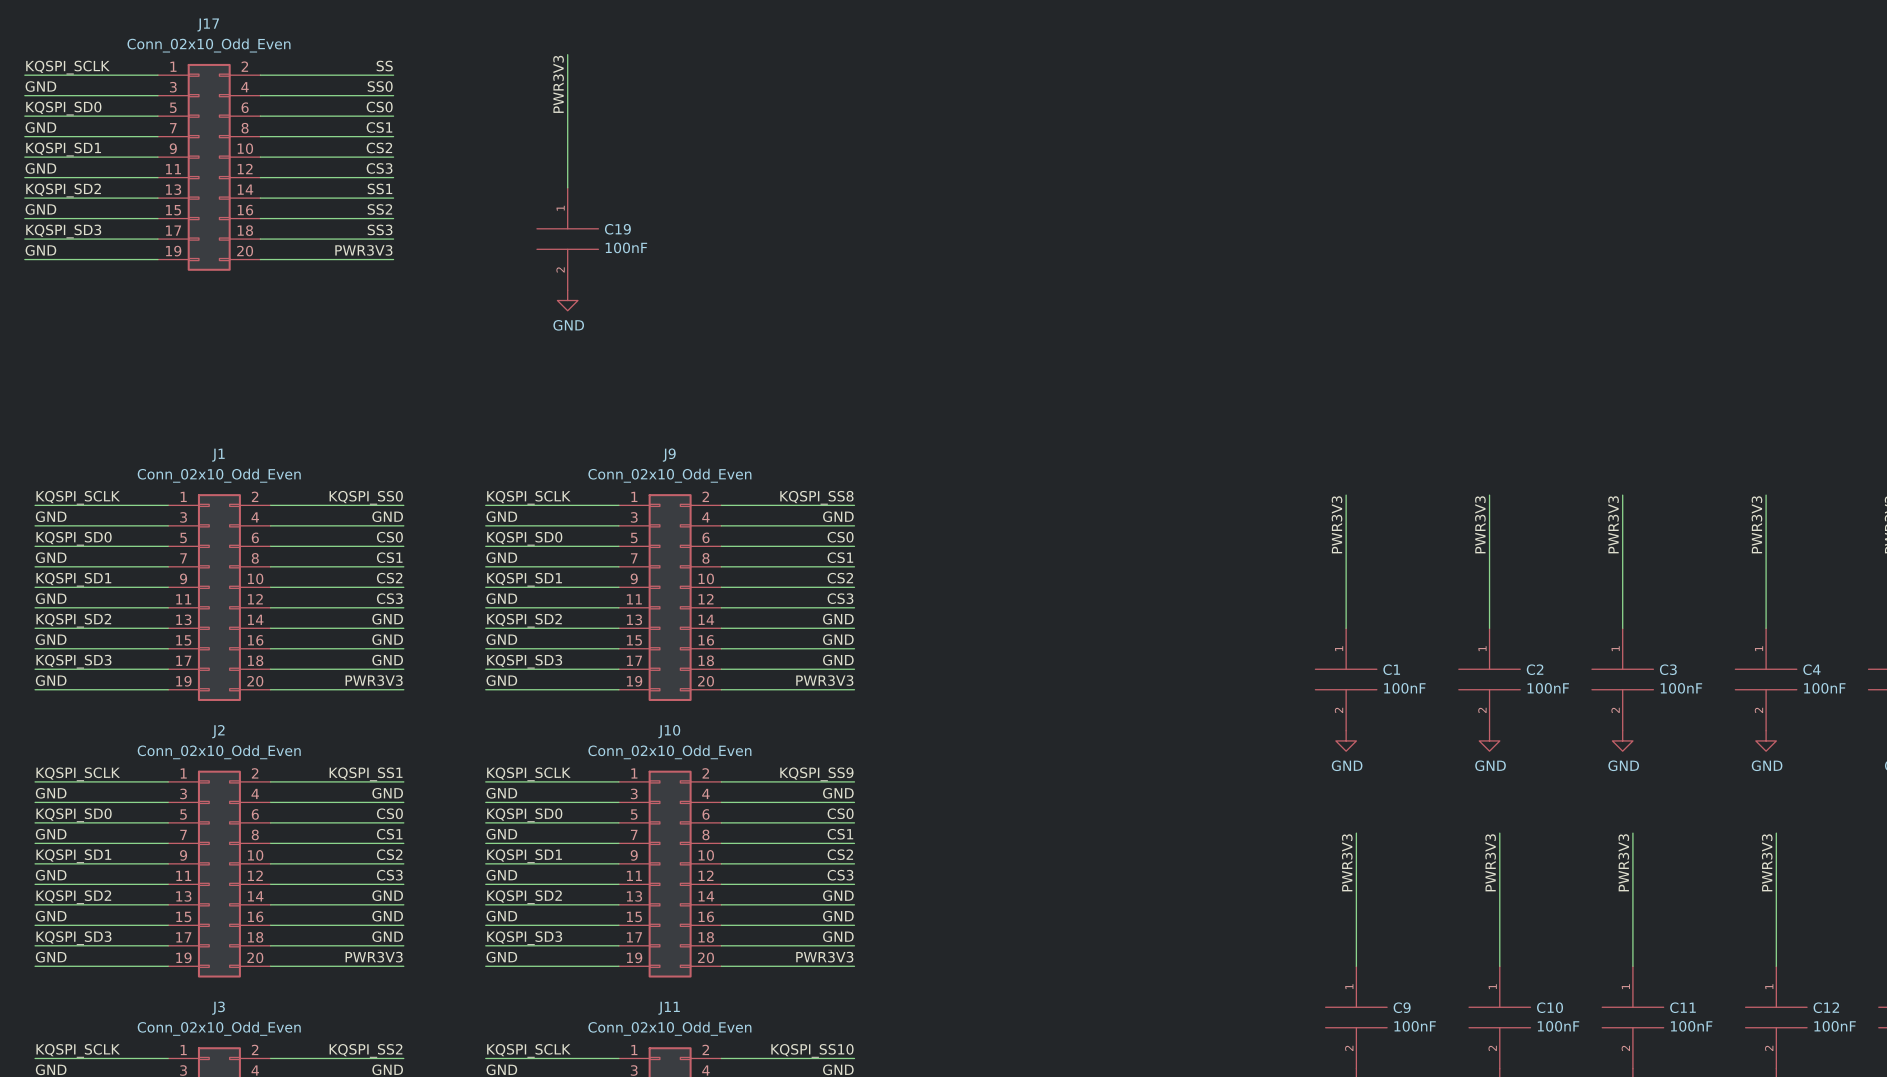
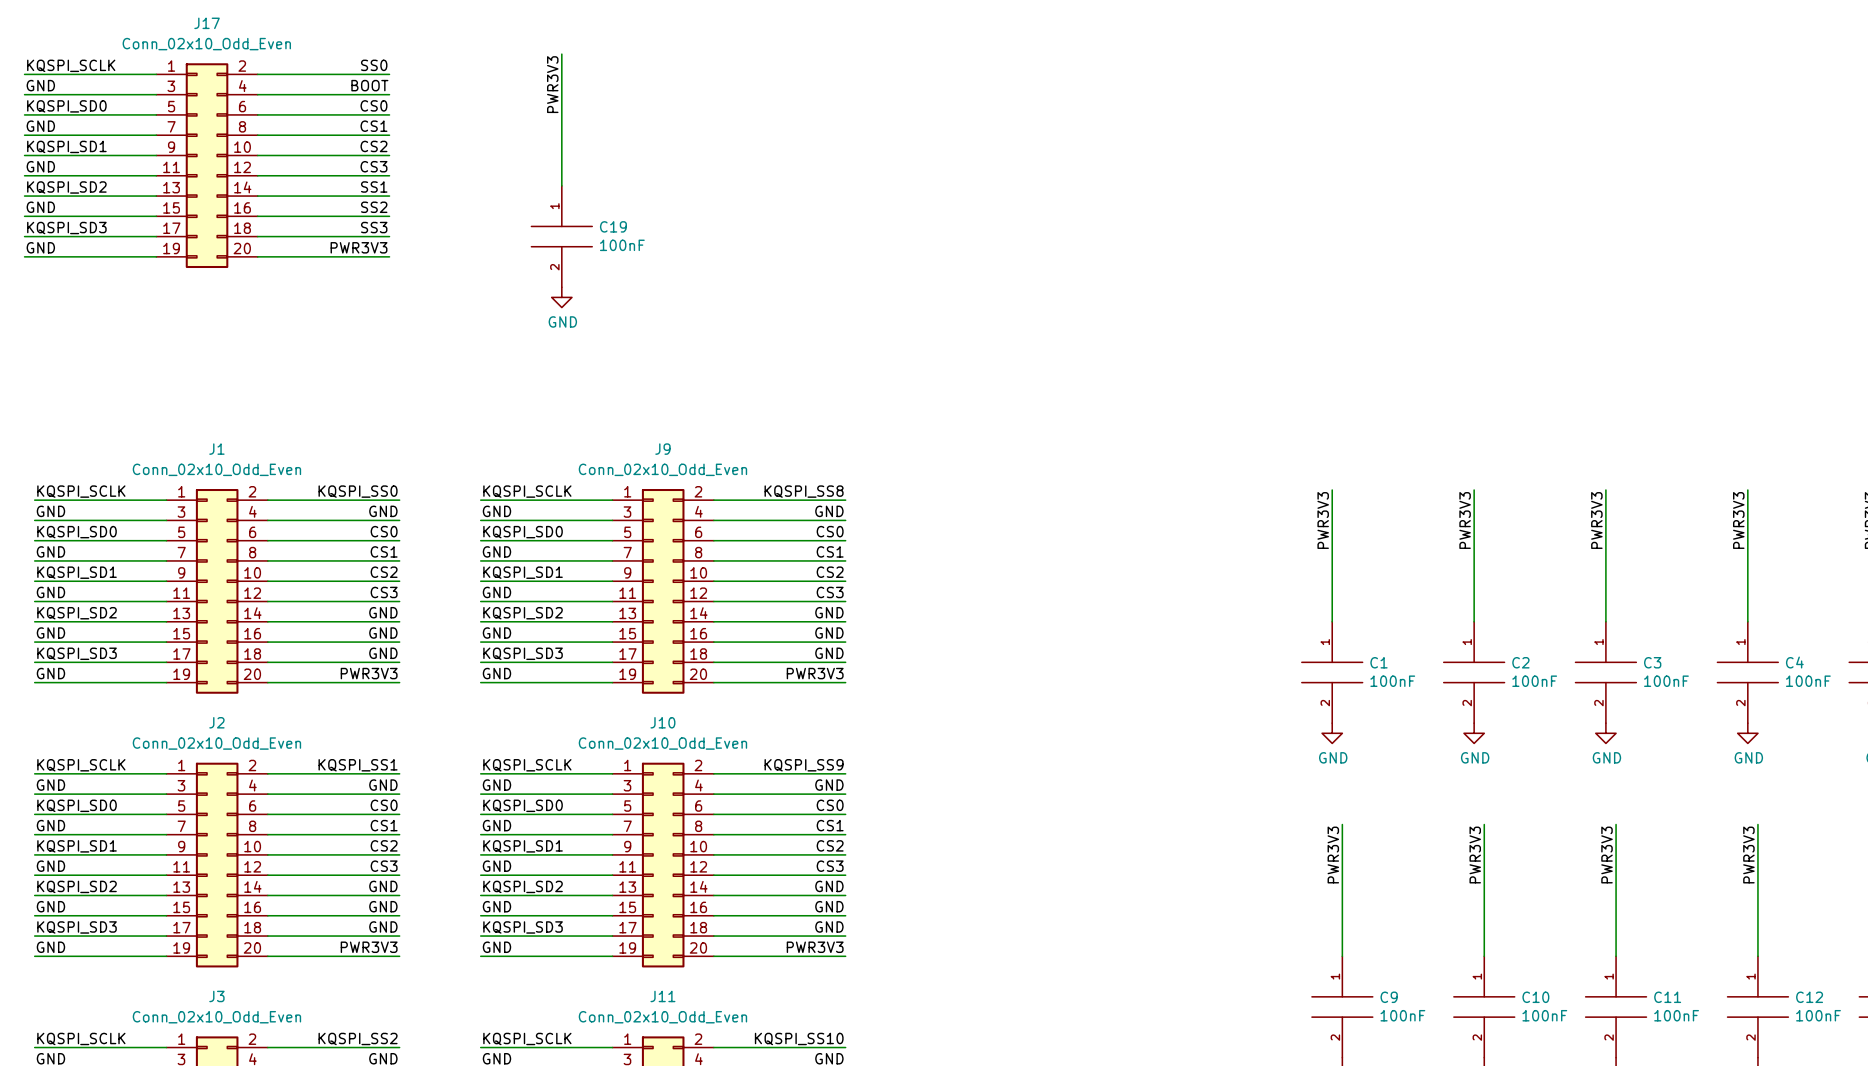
label: SS (384, 66) -> SS0 (374, 65)
label: SS0 (380, 86) -> BOOT (369, 85)

